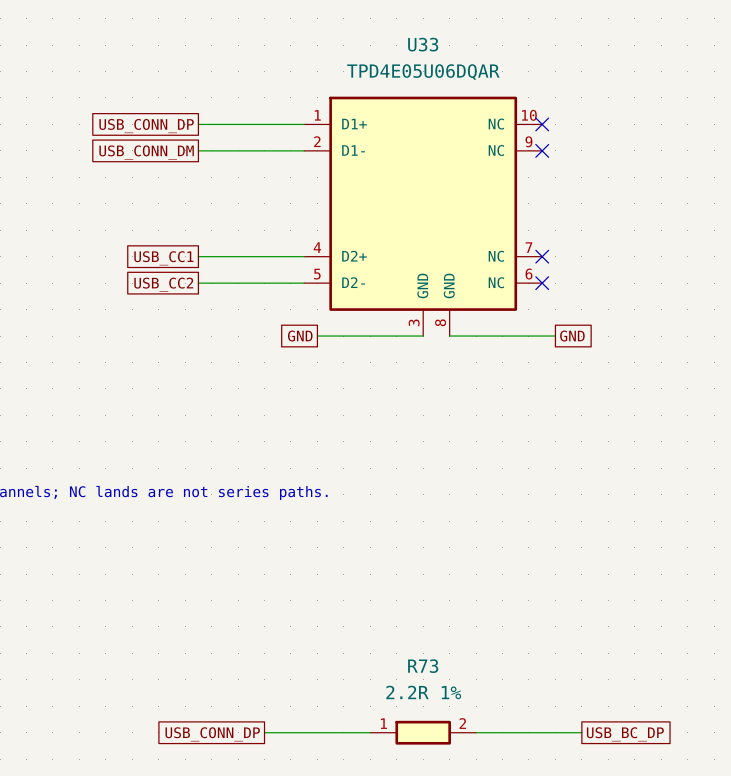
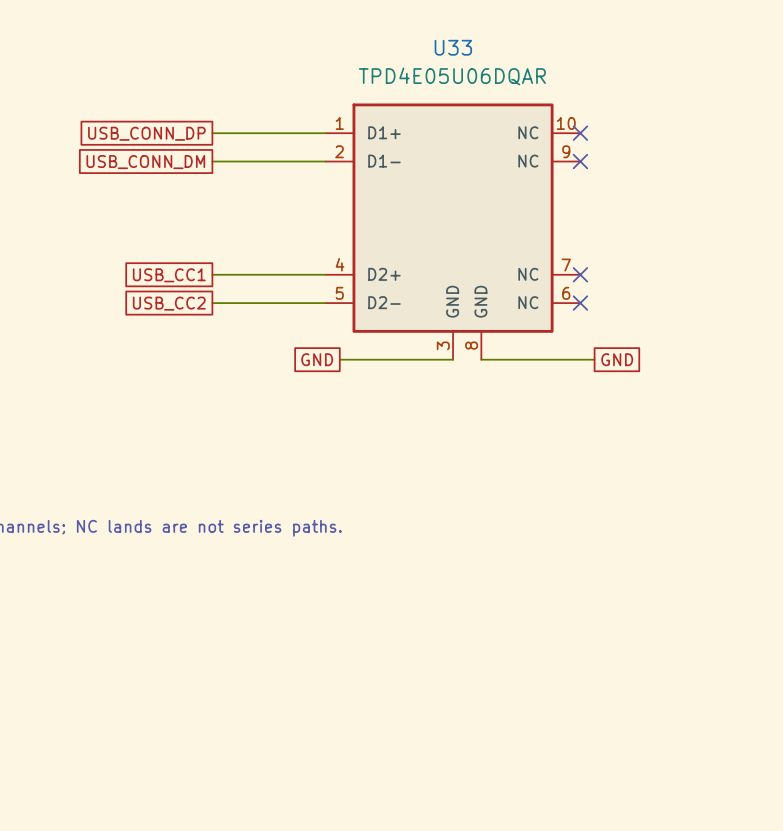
wire: (264, 732) (370, 732) -> none
R73: 2.2R 1% (423, 732) -> none
wire: (476, 732) (581, 732) -> none
global label: USB_CONN_DP (212, 734) -> none
global label: USB_BC_DP (625, 734) -> none

